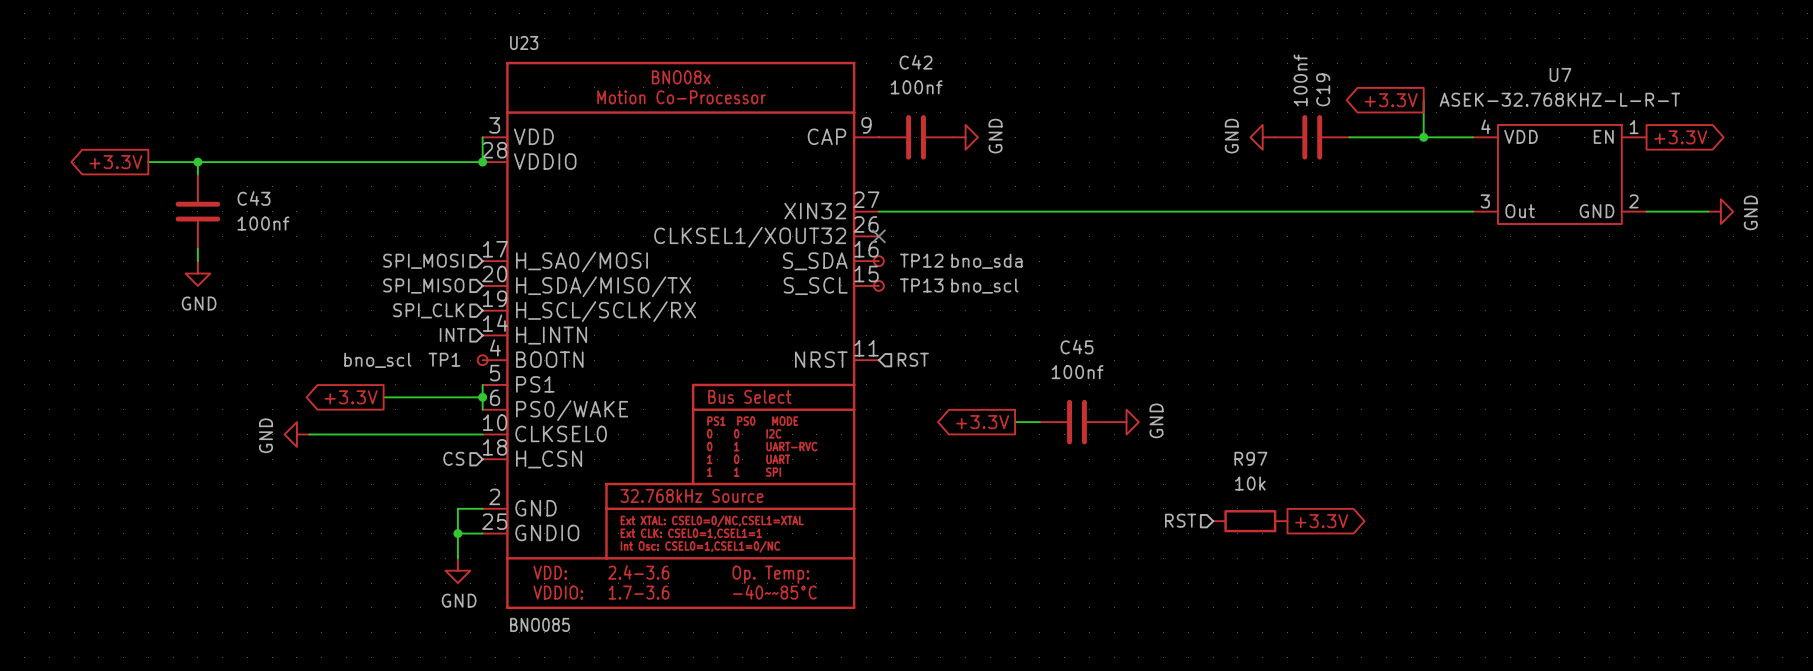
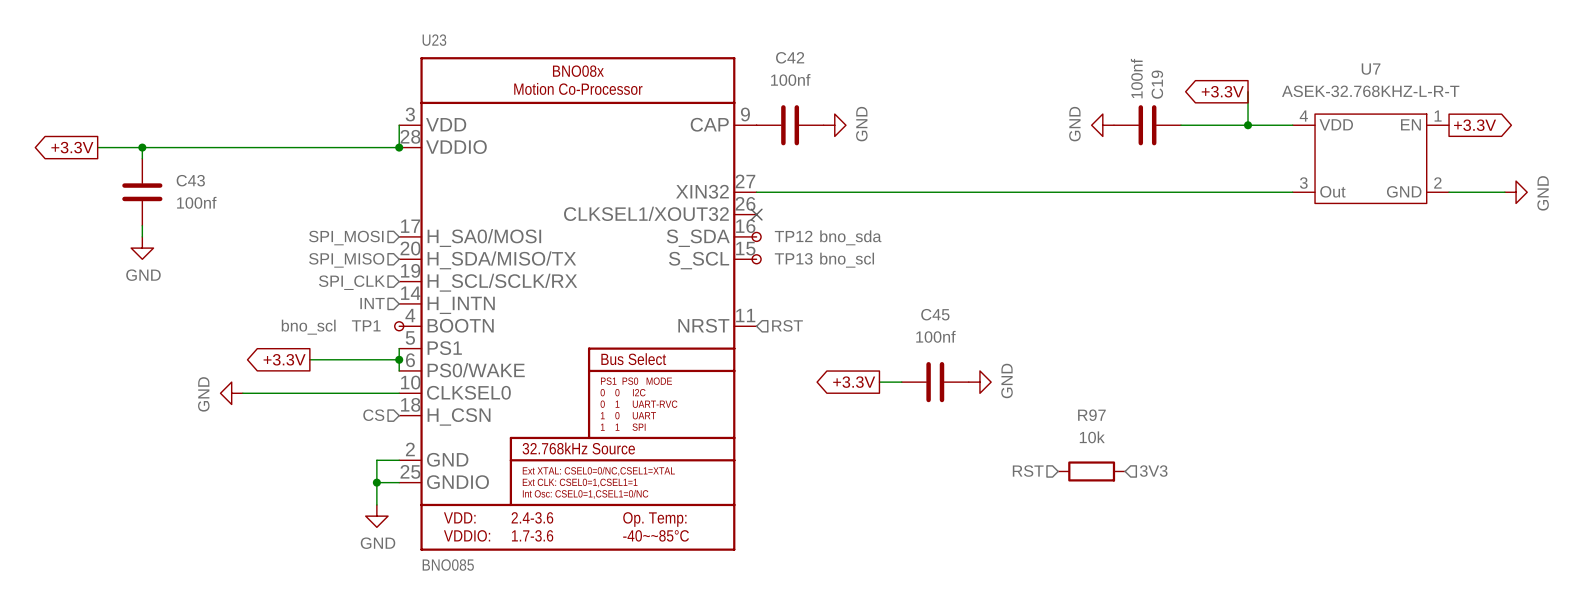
hierarchical label: none -> 3V3 (1153, 471)
global label: +3.3V (1321, 521) -> none

